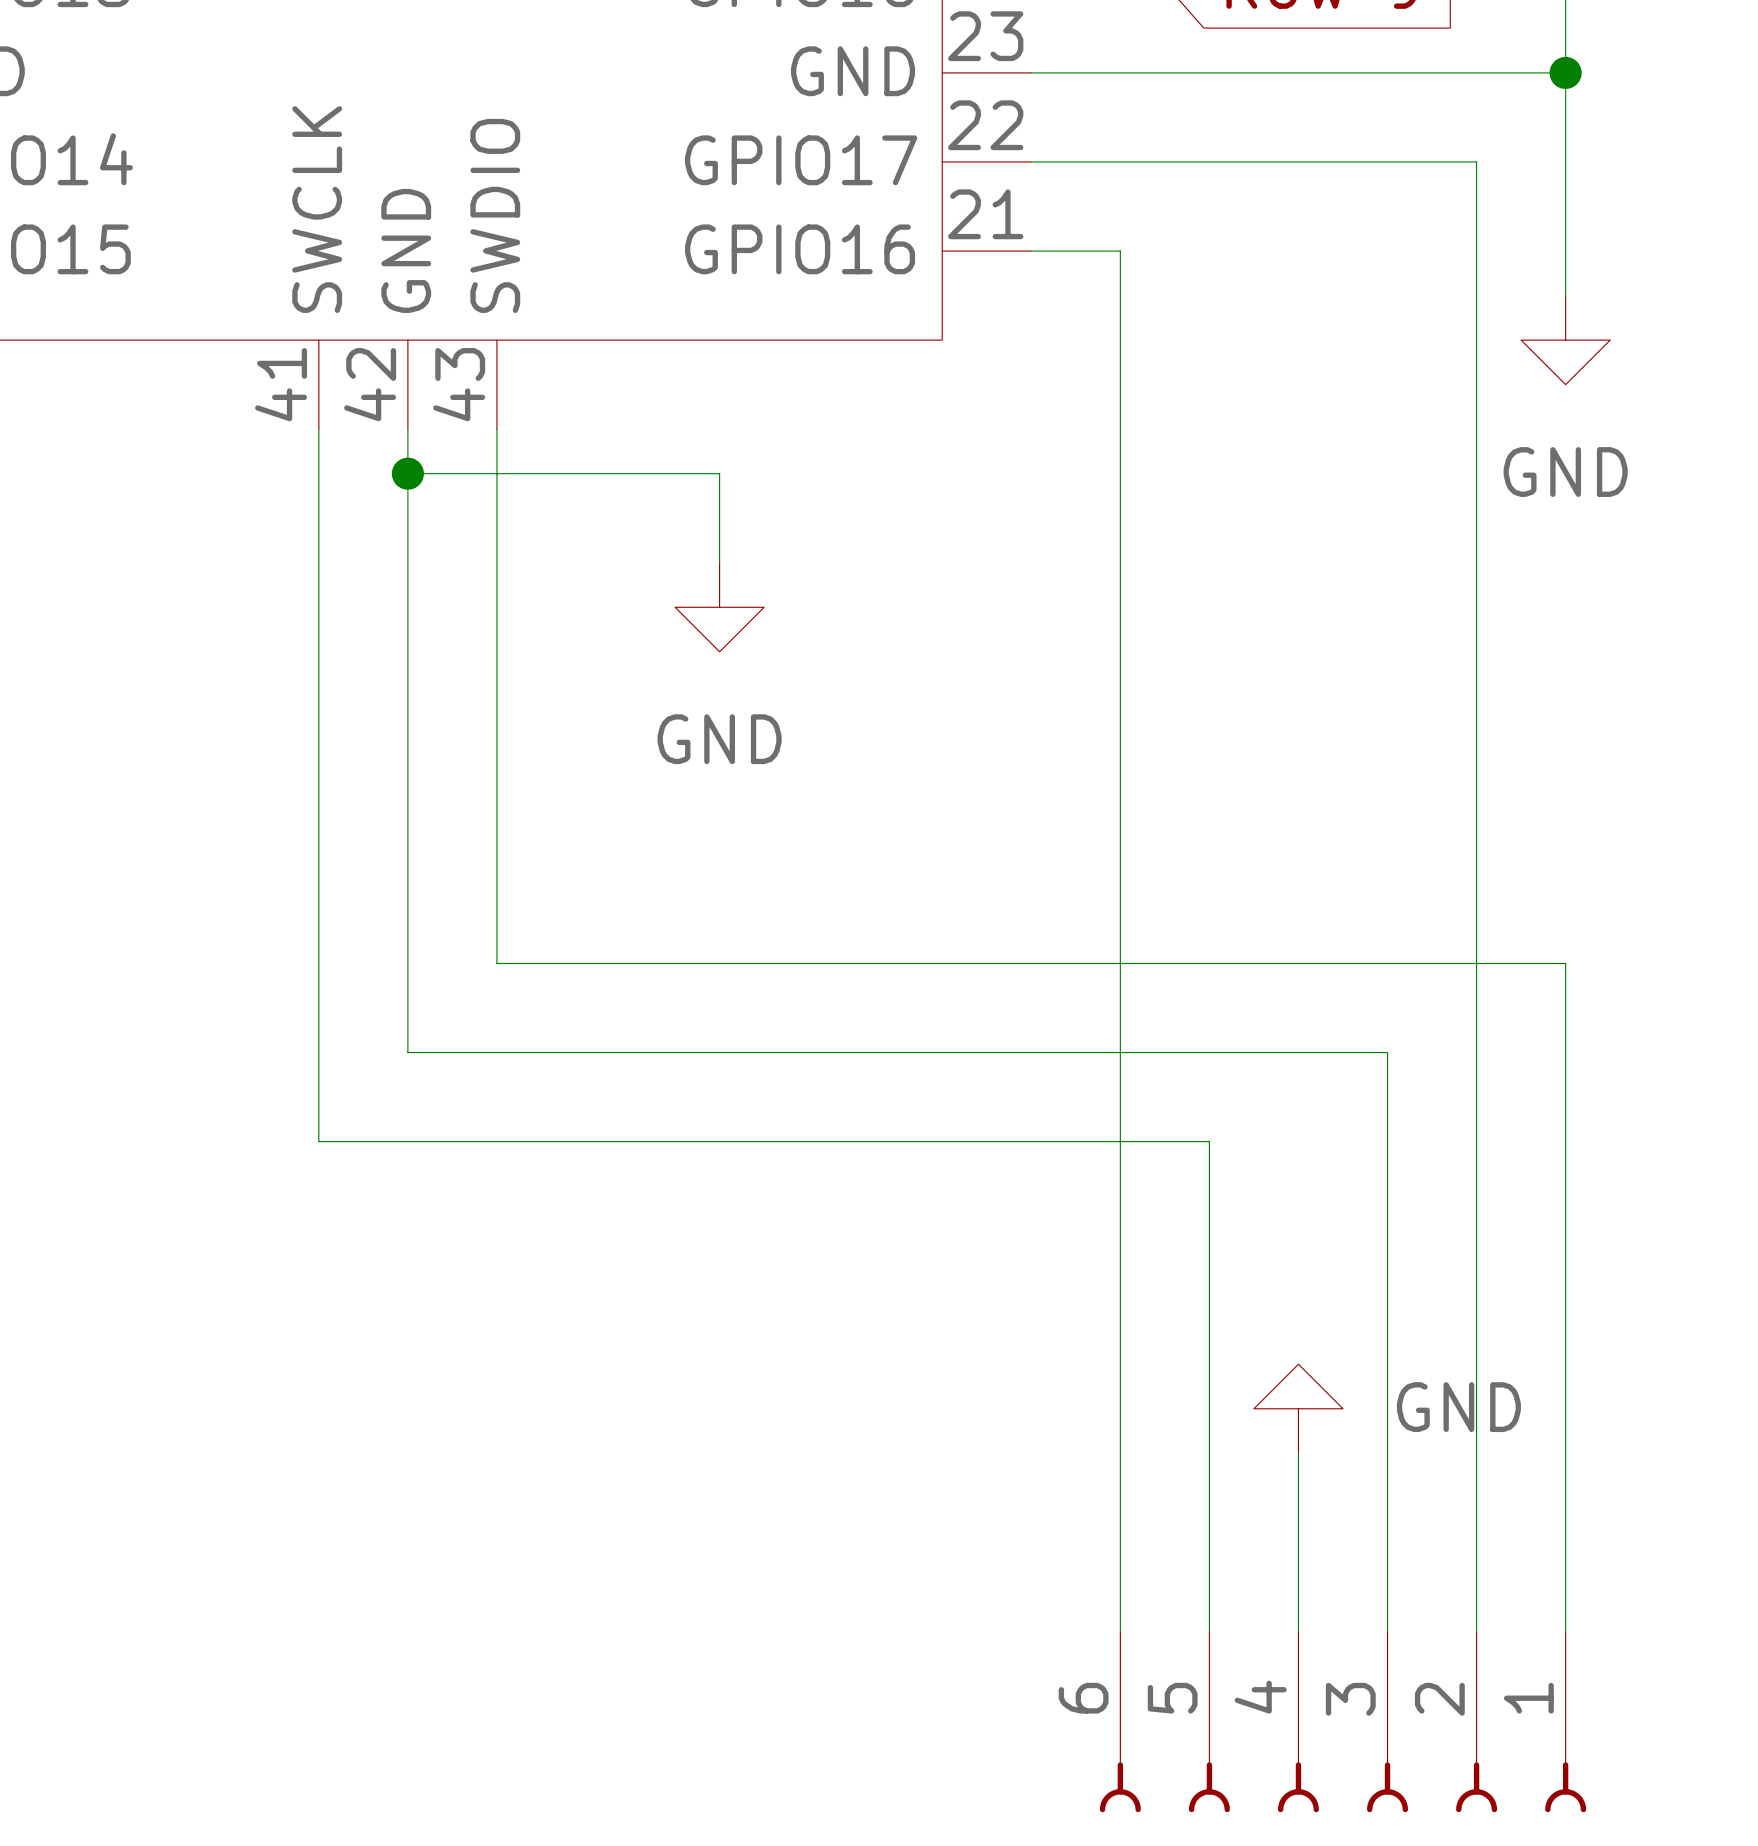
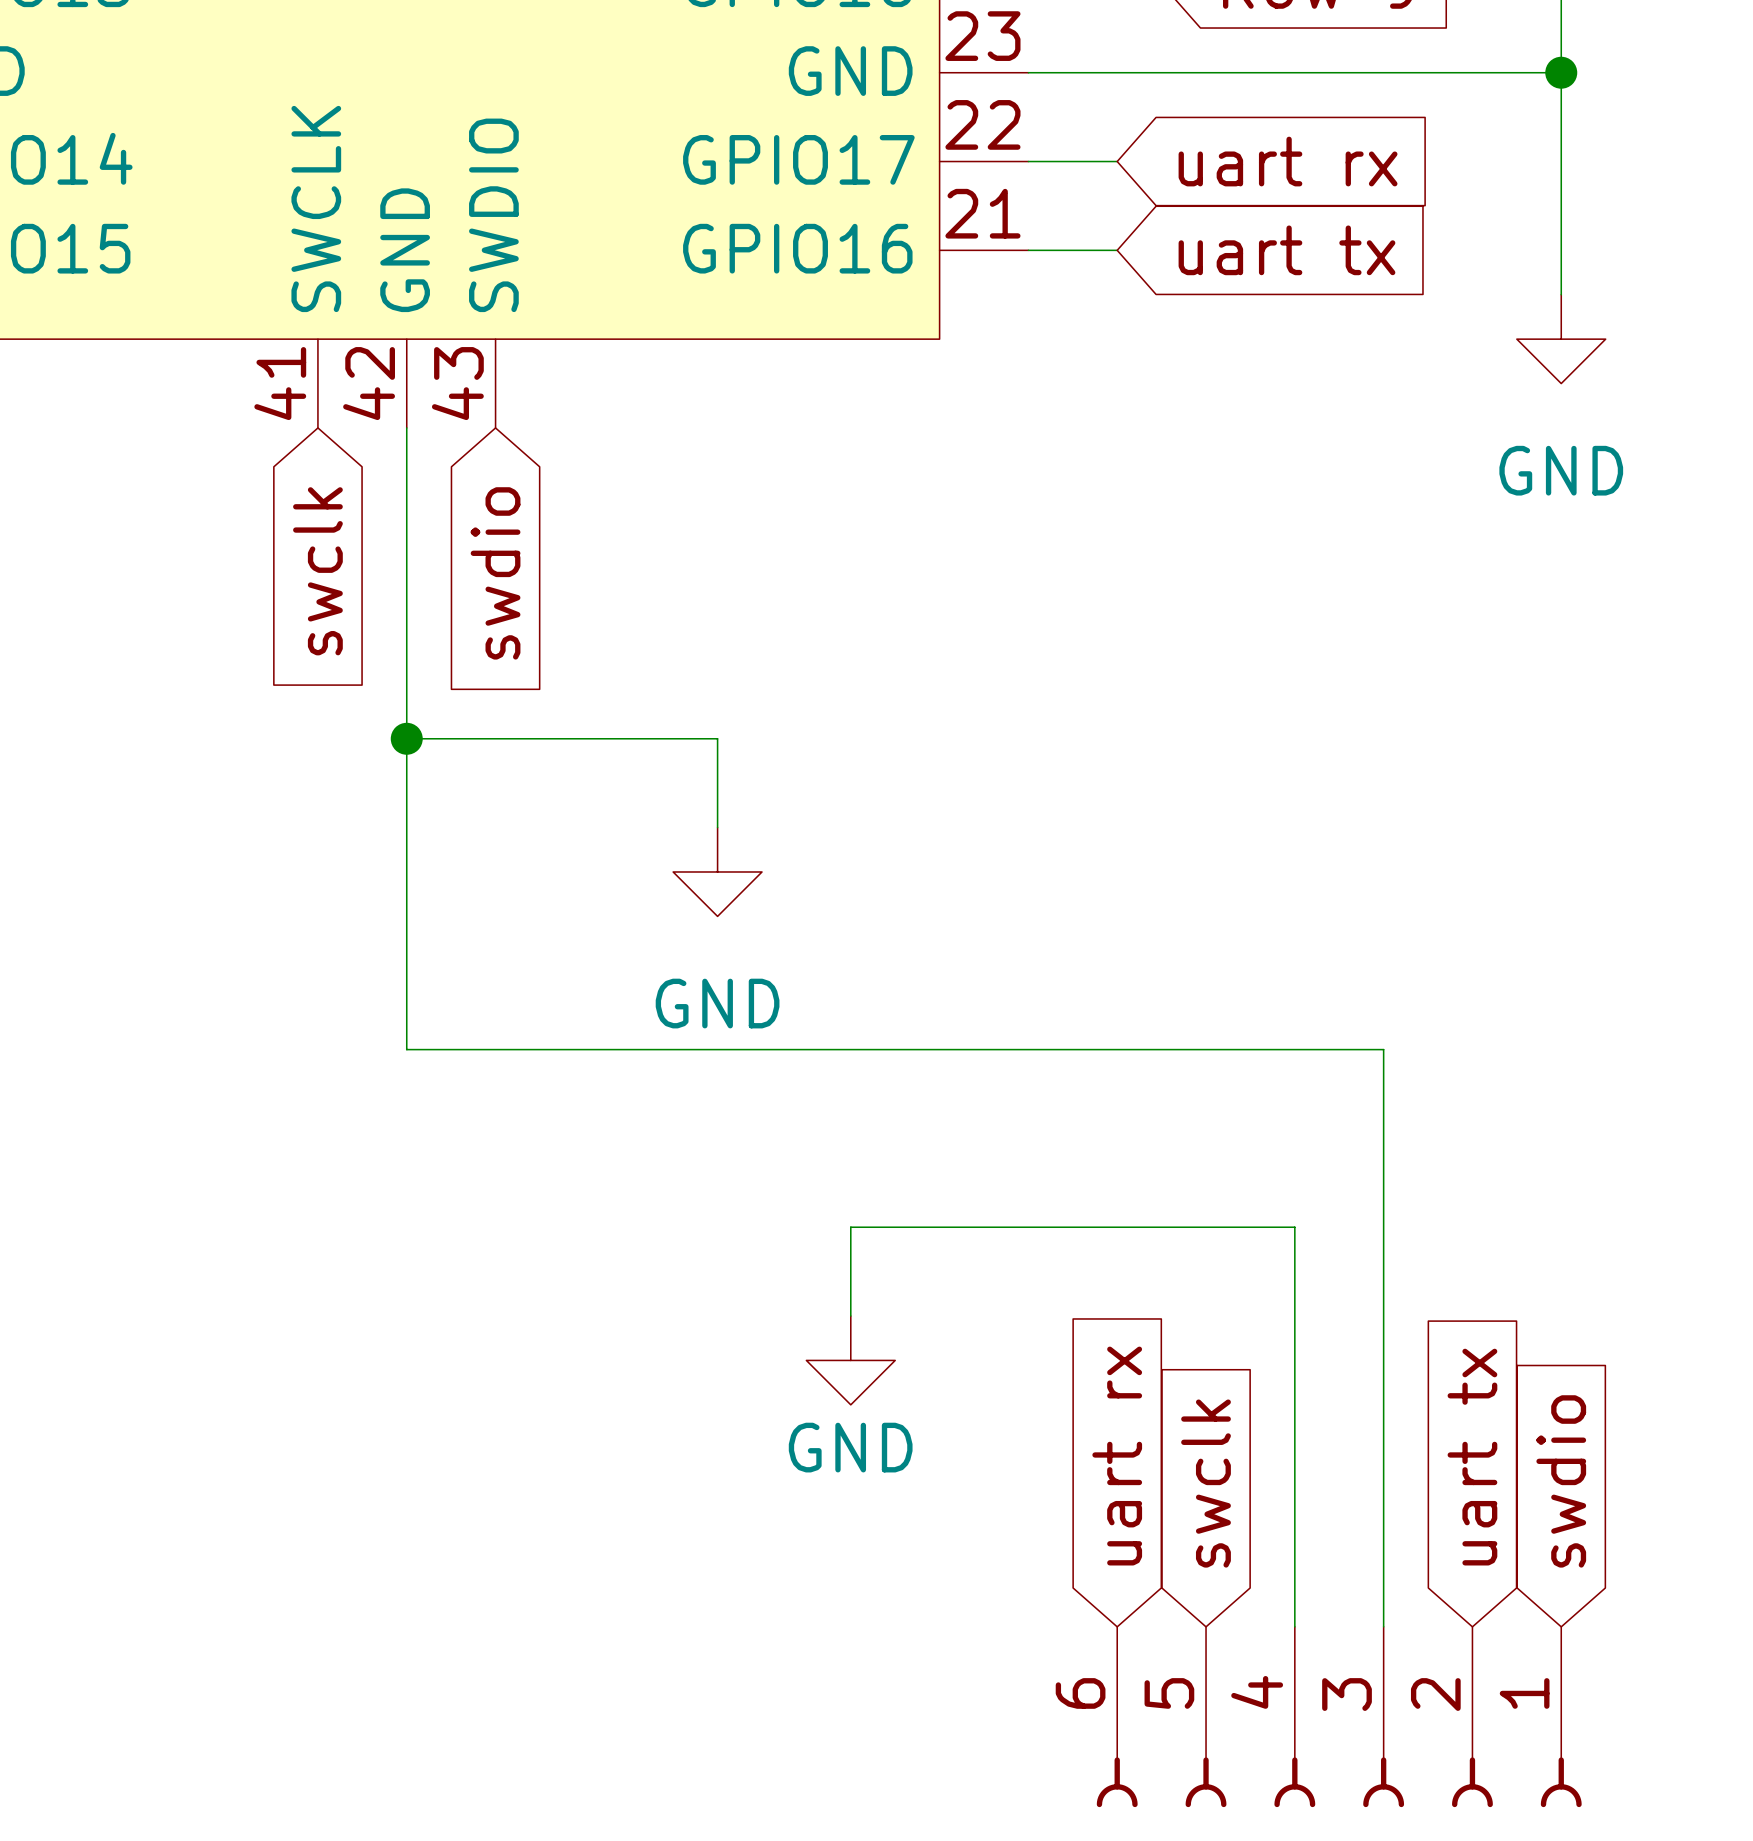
wire: (1120, 161) (1476, 161) (1476, 1631) -> none
global label: none -> uart rx (1288, 161)
wire: (1120, 251) (1120, 1631) -> none
global label: none -> uart tx (1286, 250)
wire: (318, 429) (318, 1141) (1209, 1141) (1209, 1631) -> none
wire: (496, 429) (496, 963) (1565, 963) (1565, 1631) -> none
wire: (407, 473) (719, 473) (719, 562) -> (406, 738) (717, 738) (717, 827)
junction: (407, 473) -> none
global label: none -> swclk (317, 571)
global label: none -> swdio (495, 573)
power symbol position: GND (719, 607) -> GND (717, 871)
junction: none -> (406, 738)
wire: none -> (850, 1316) (850, 1227) (1294, 1227) (1294, 1449)
power symbol: none -> GND (850, 1360)
power symbol: GND (1298, 1408) -> none
global label: none -> uart rx (1117, 1456)
global label: none -> uart tx (1472, 1457)
global label: none -> swdio (1561, 1481)
global label: none -> swclk (1206, 1483)

